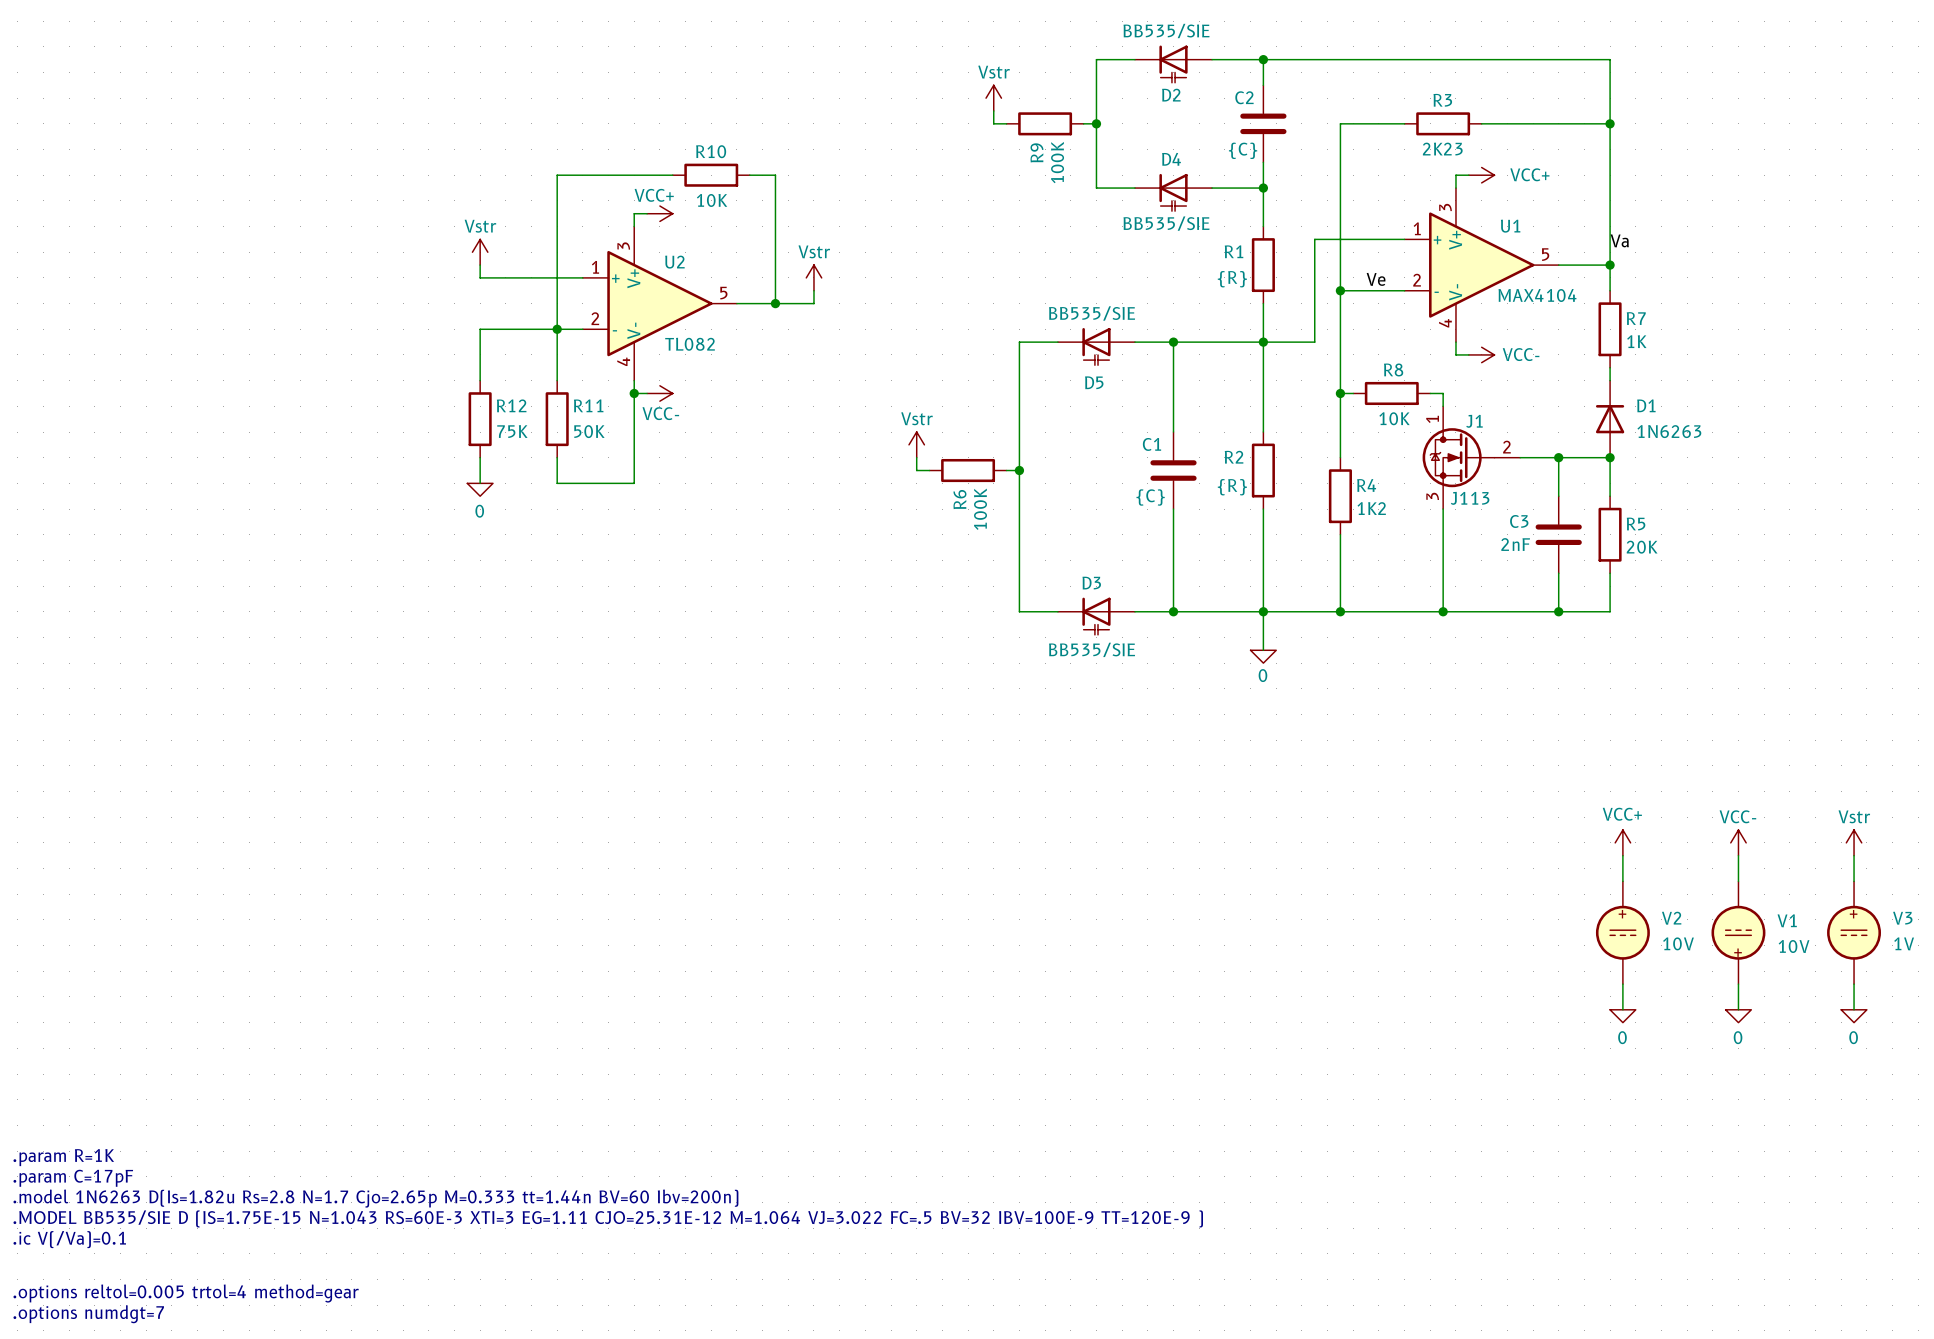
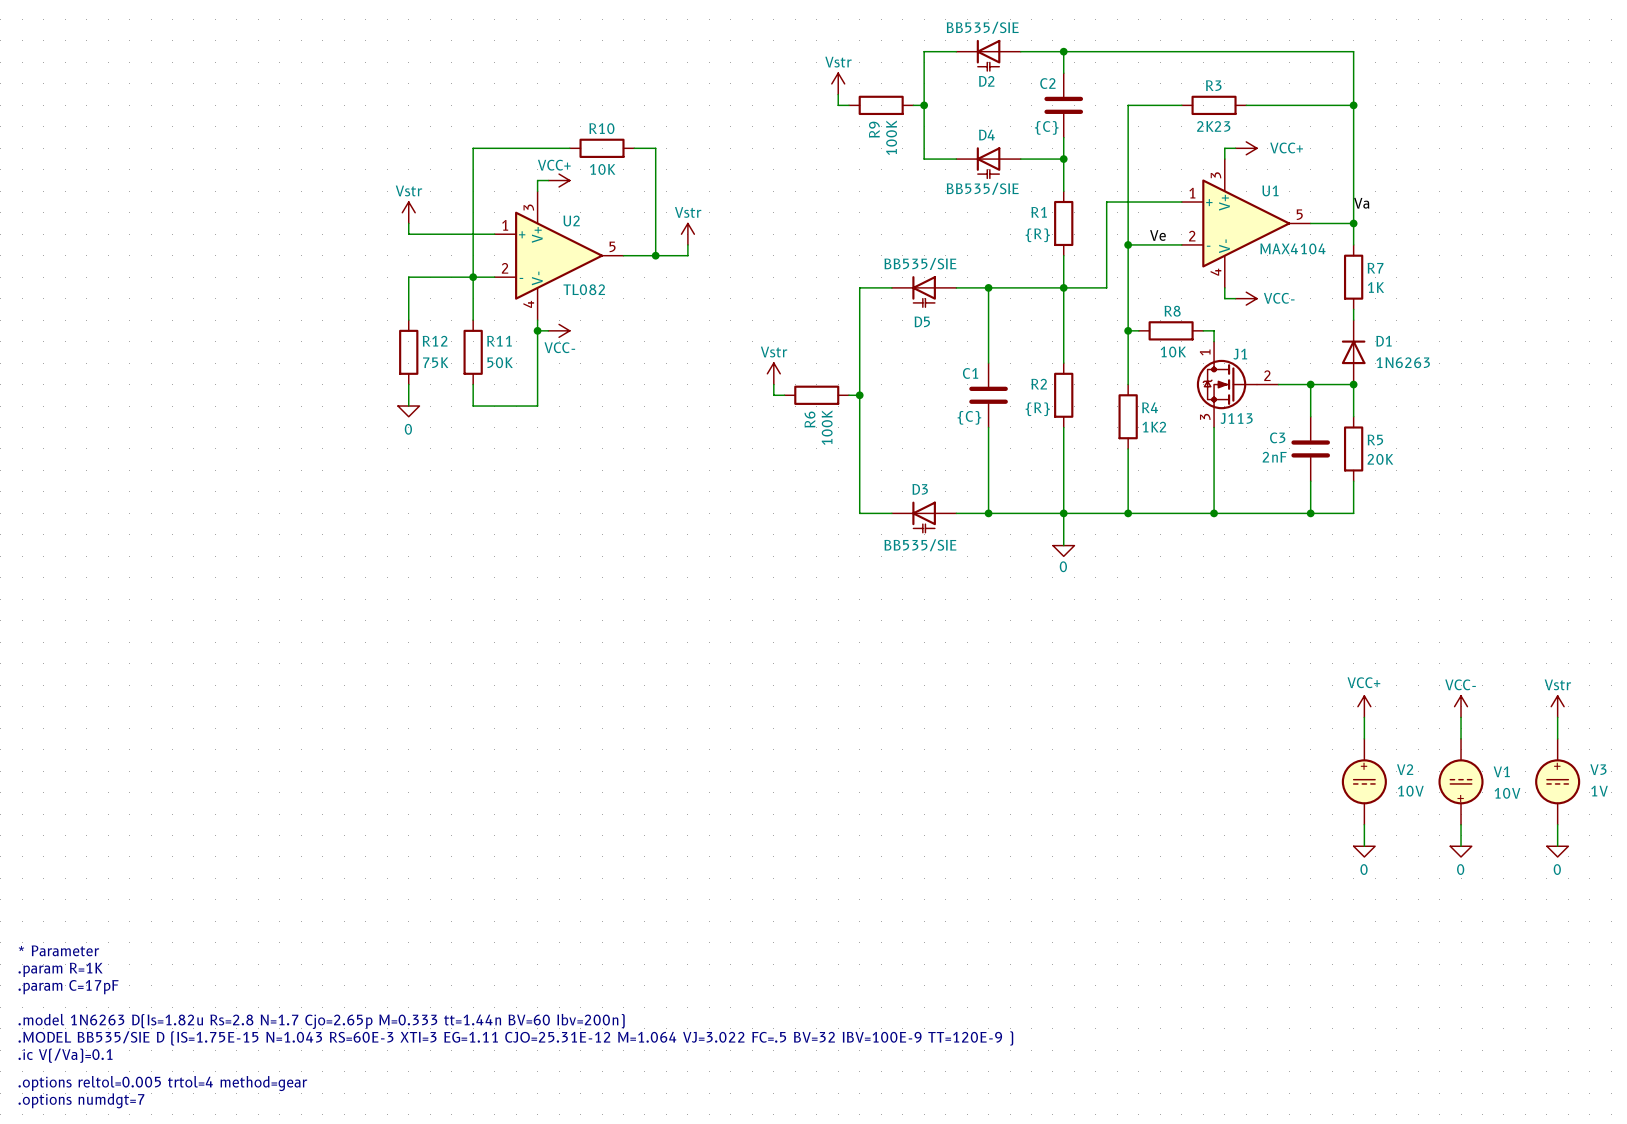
text: none -> * Parameter (58, 950)
text: .model 1N6263 D(Is=1.82u Rs=2.8 N=1.7 Cjo=2.65p M=0.333 tt=1.44n BV=60 Ibv=200n) (375, 1198) -> none
text: .MODEL BB535/SIE D (IS=1.75E-15 N=1.043 RS=60E-3 XTI=3 EG=1.11 CJO=25.31E-12 M=1.064 VJ=3.022 FC=.5 BV=32 IBV=100E-9 TT=120E-9 ) (608, 1218) -> .model 1N6263 D(Is=1.82u Rs=2.8 N=1.7 Cjo=2.65p M=0.333 tt=1.44n BV=60 Ibv=200n) (321, 1021)
text: .ic V(/Va)=0.1 (69, 1239) -> .MODEL BB535/SIE D (IS=1.75E-15 N=1.043 RS=60E-3 XTI=3 EG=1.11 CJO=25.31E-12 M=1.064 VJ=3.022 FC=.5 BV=32 IBV=100E-9 TT=120E-9 ) (515, 1038)
text: none -> .ic V(/Va)=0.1 (65, 1055)

